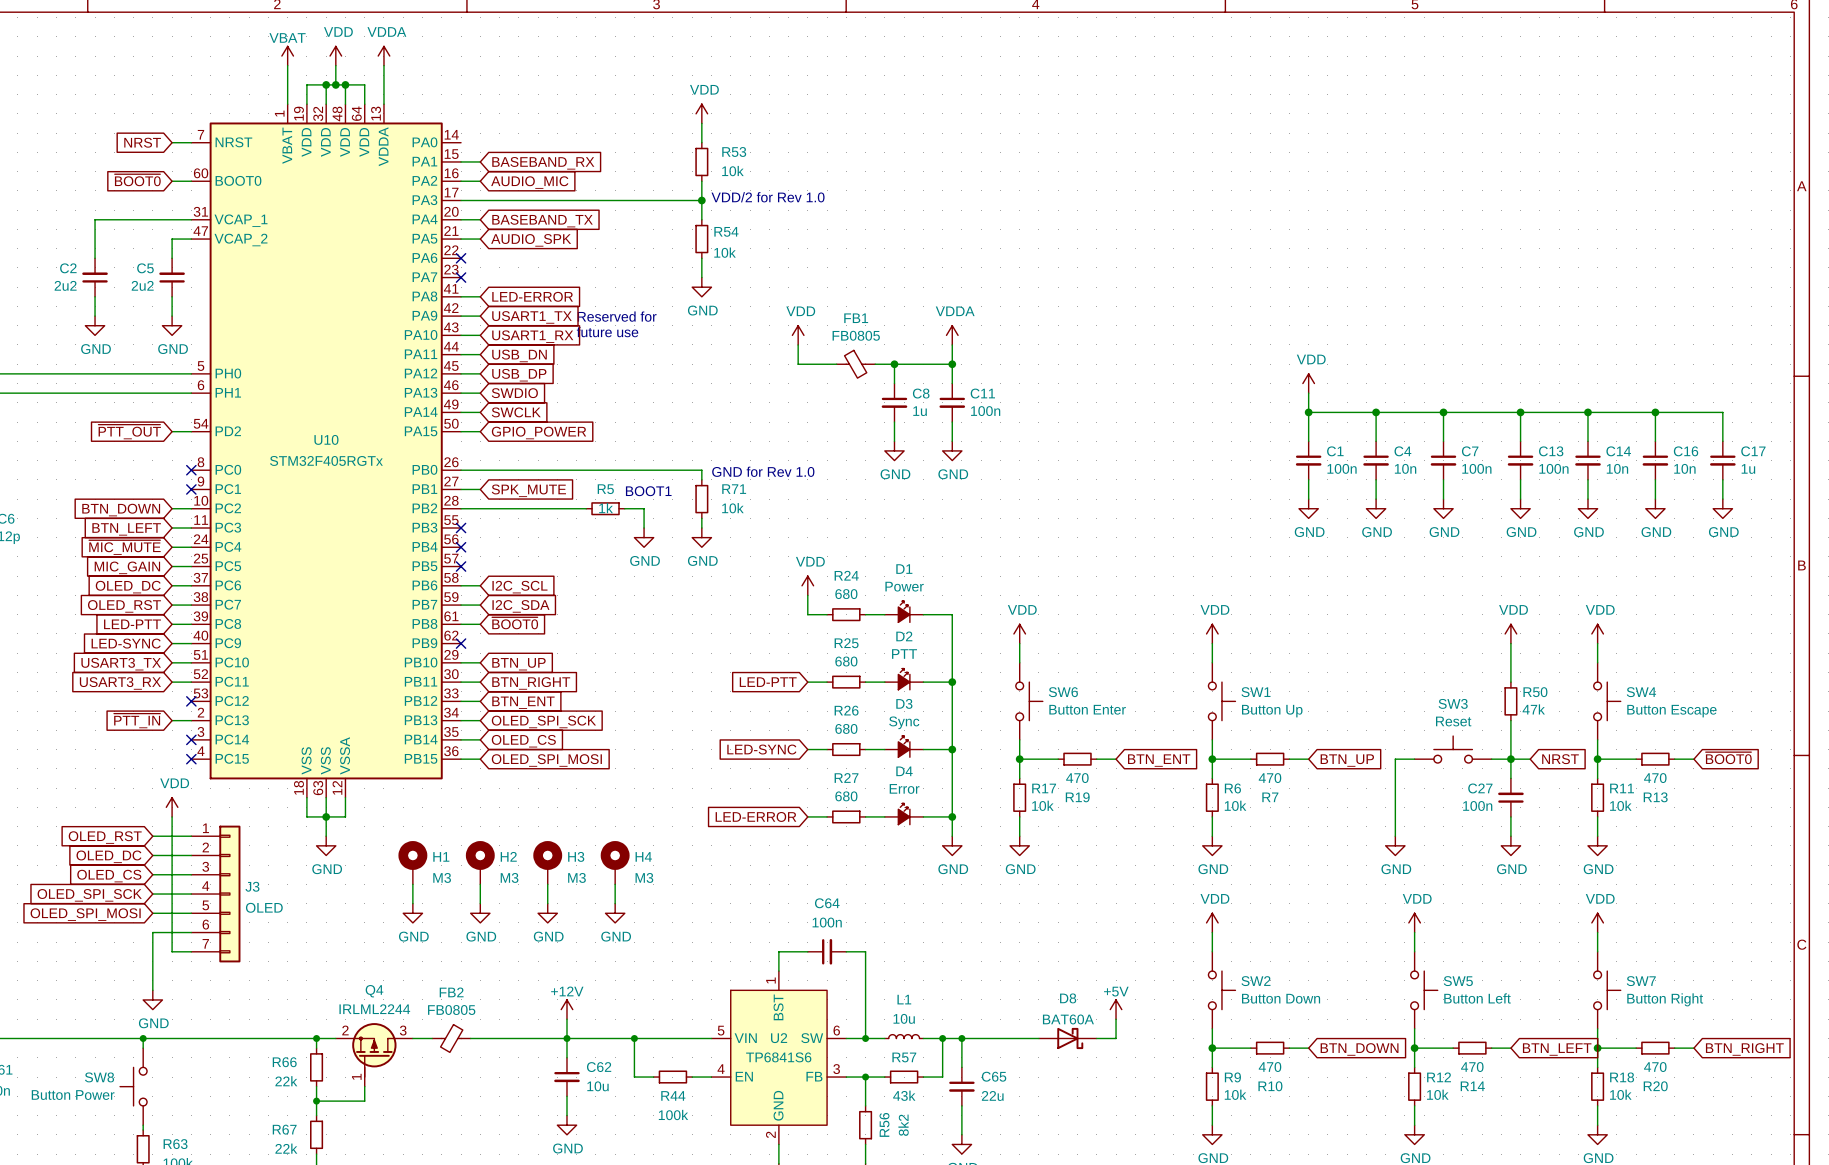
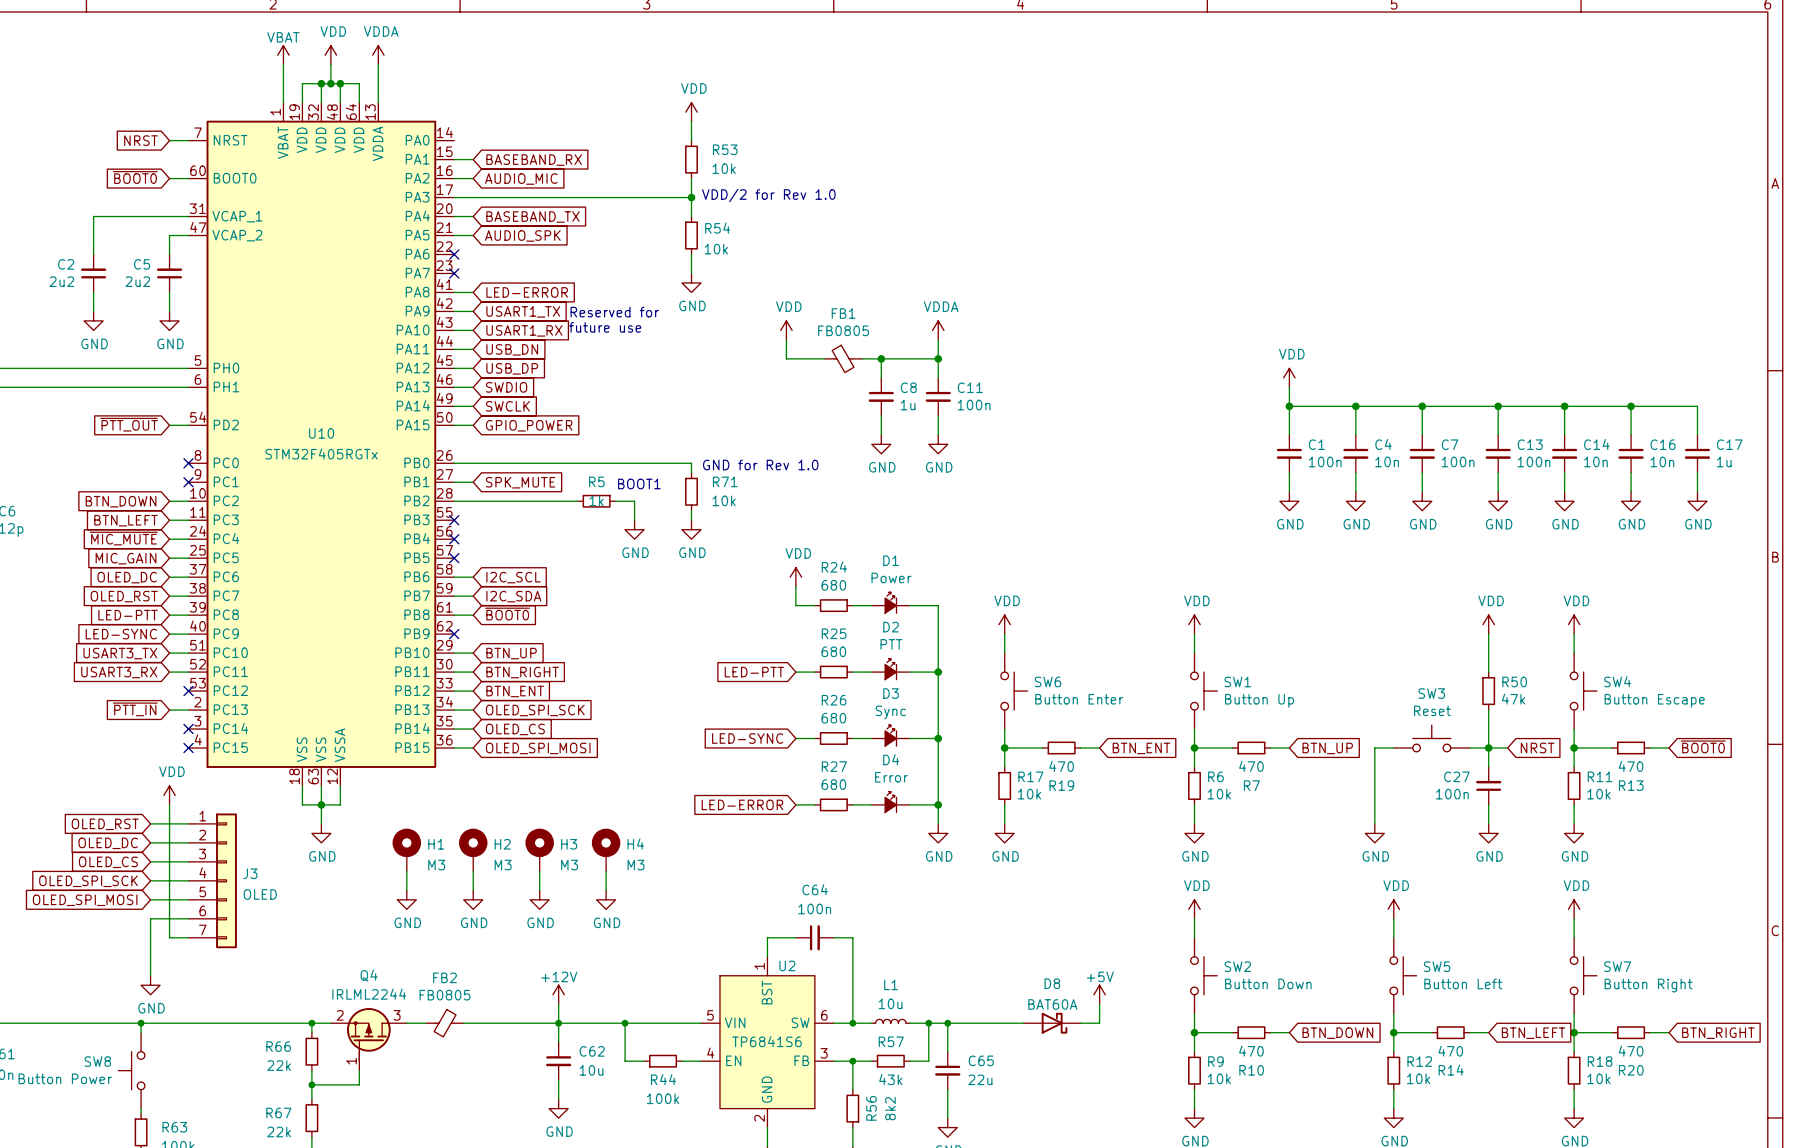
U2 name position: U2 (779, 1038) -> U2 (787, 965)

